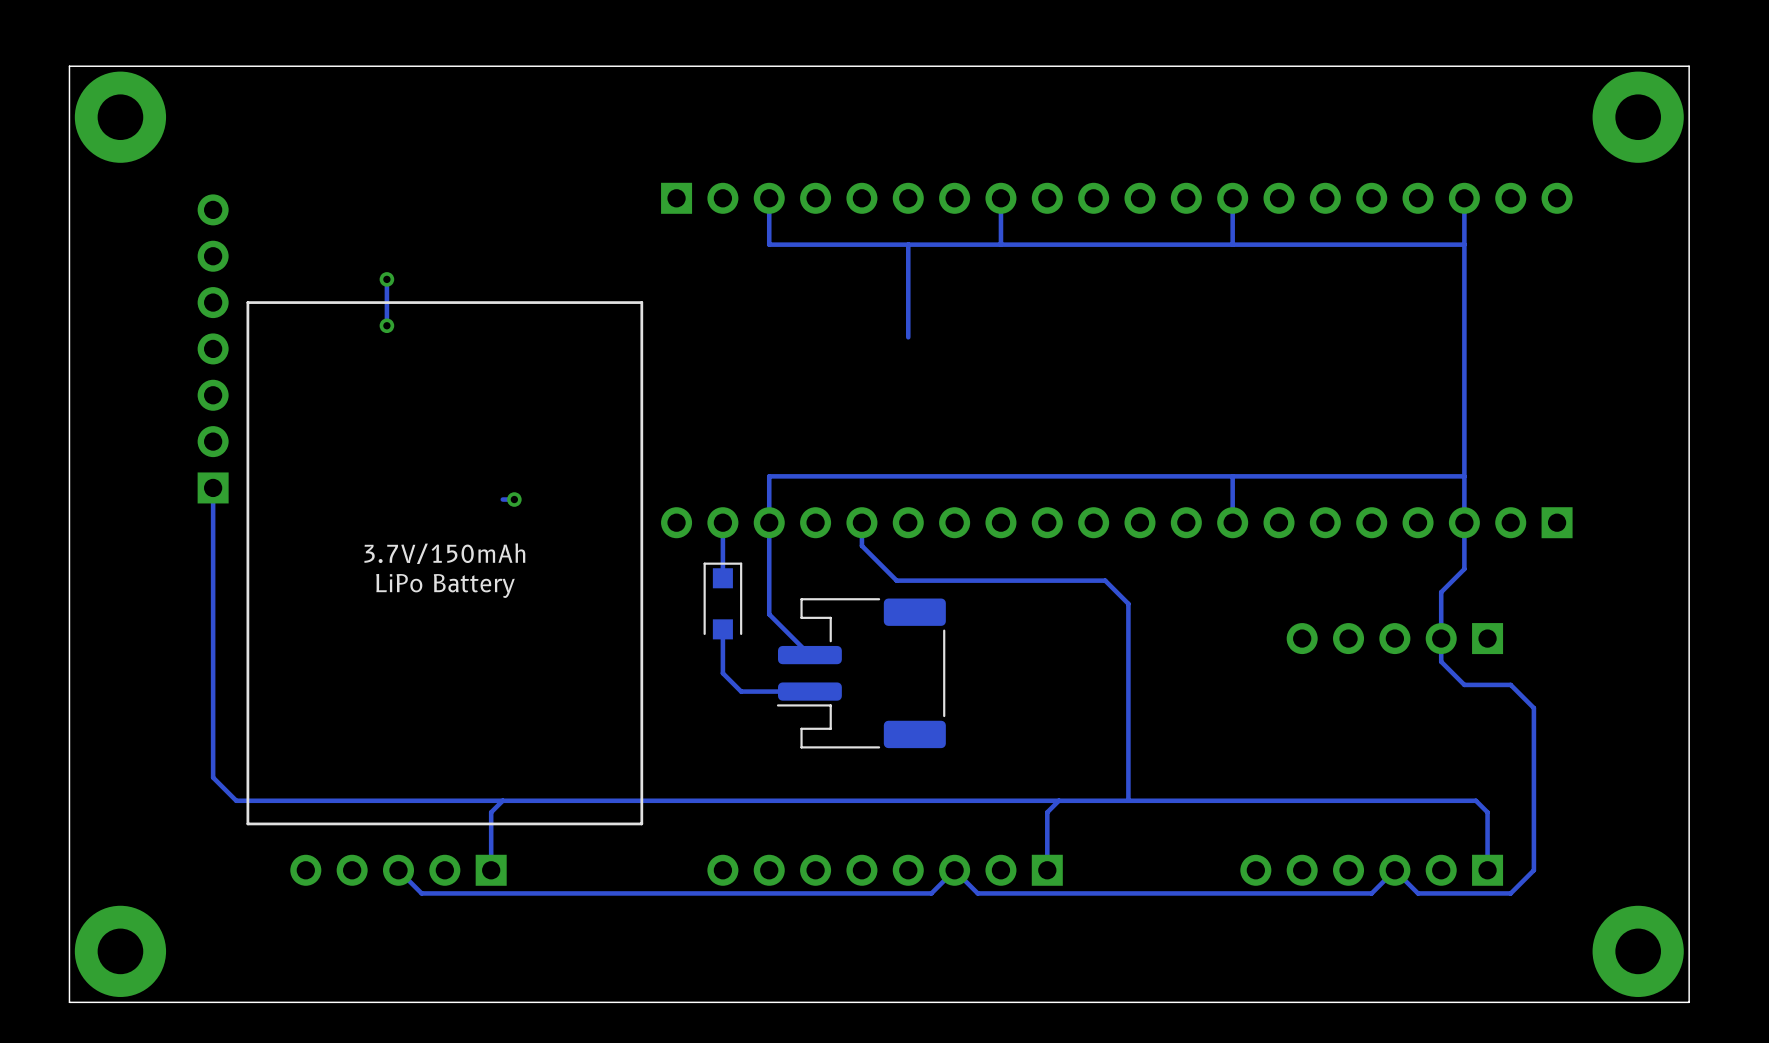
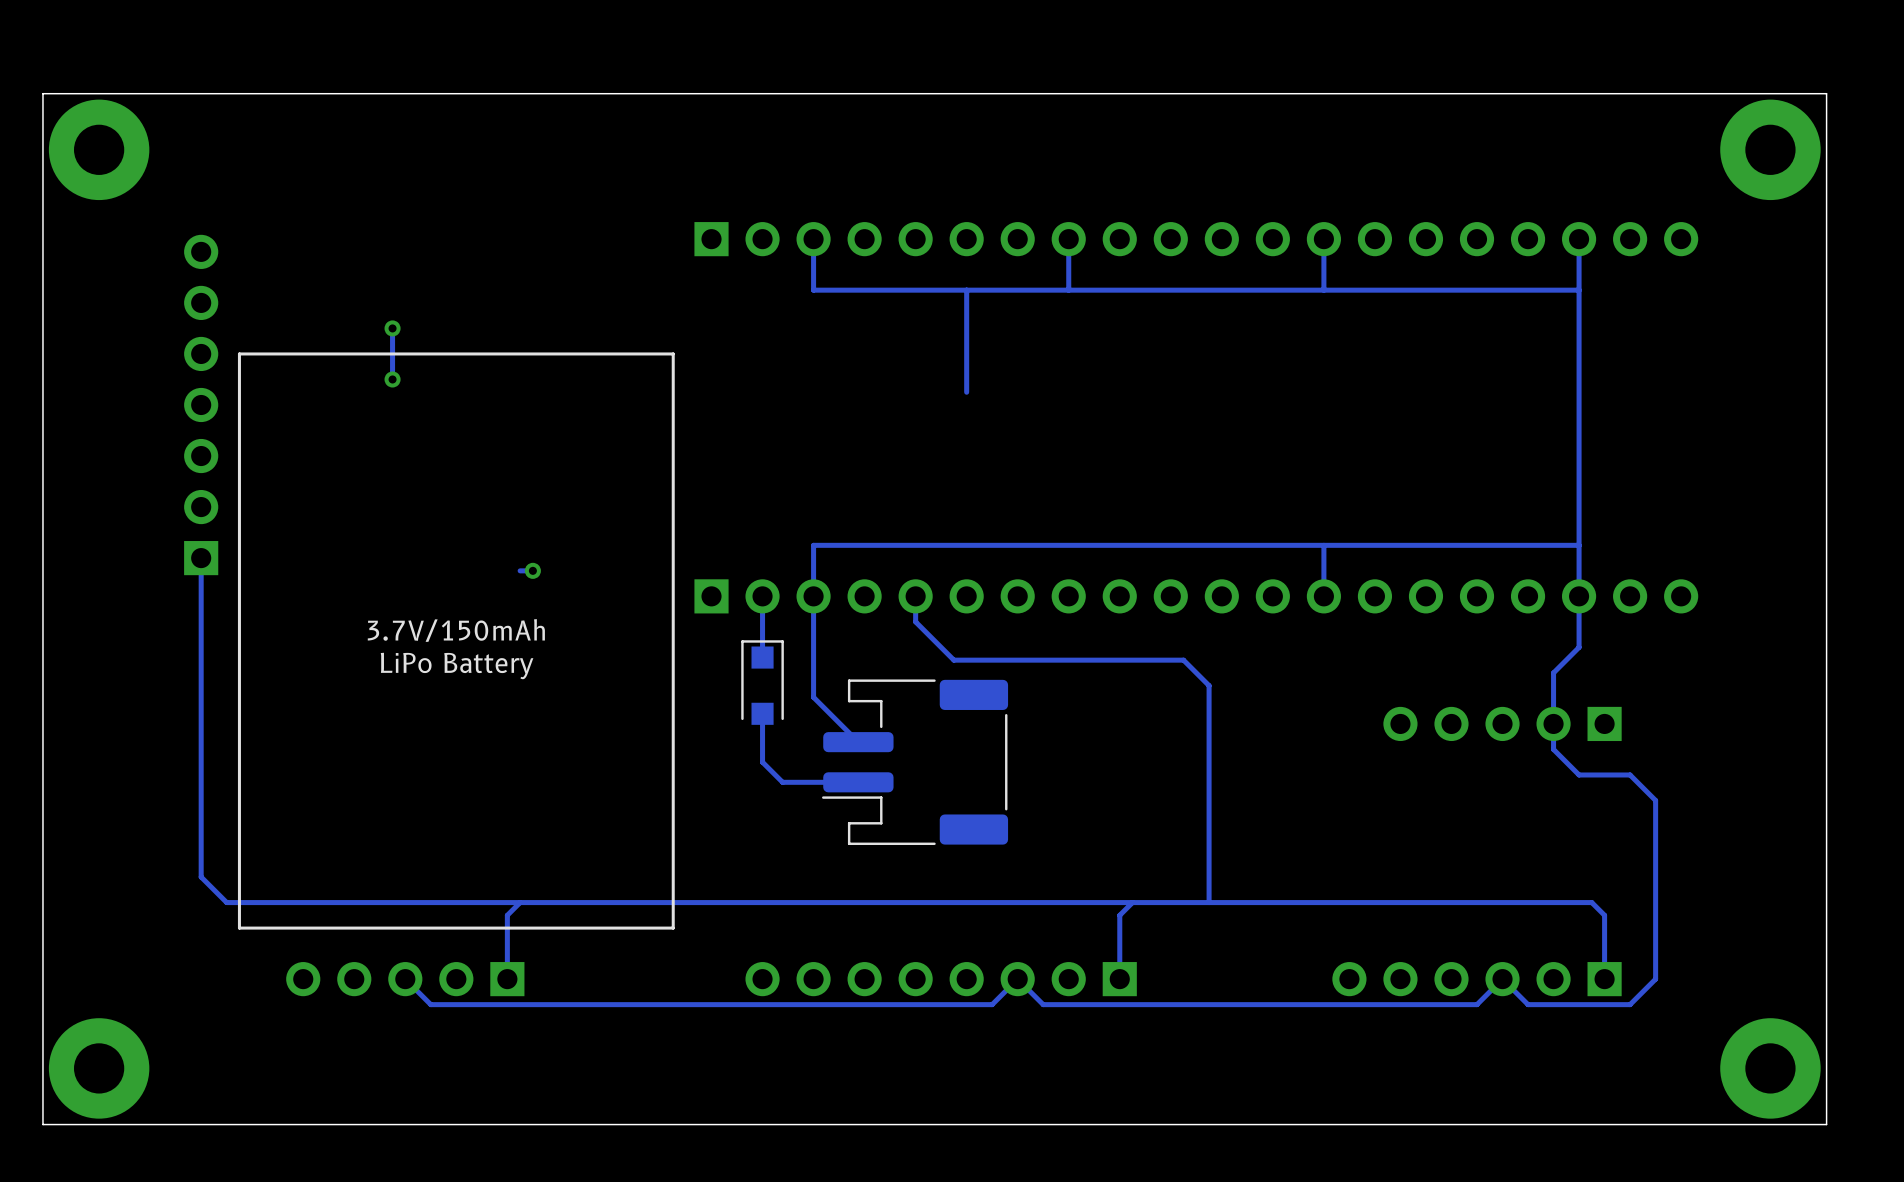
part rotation: 0° (1116, 522) -> 180° (1196, 596)

